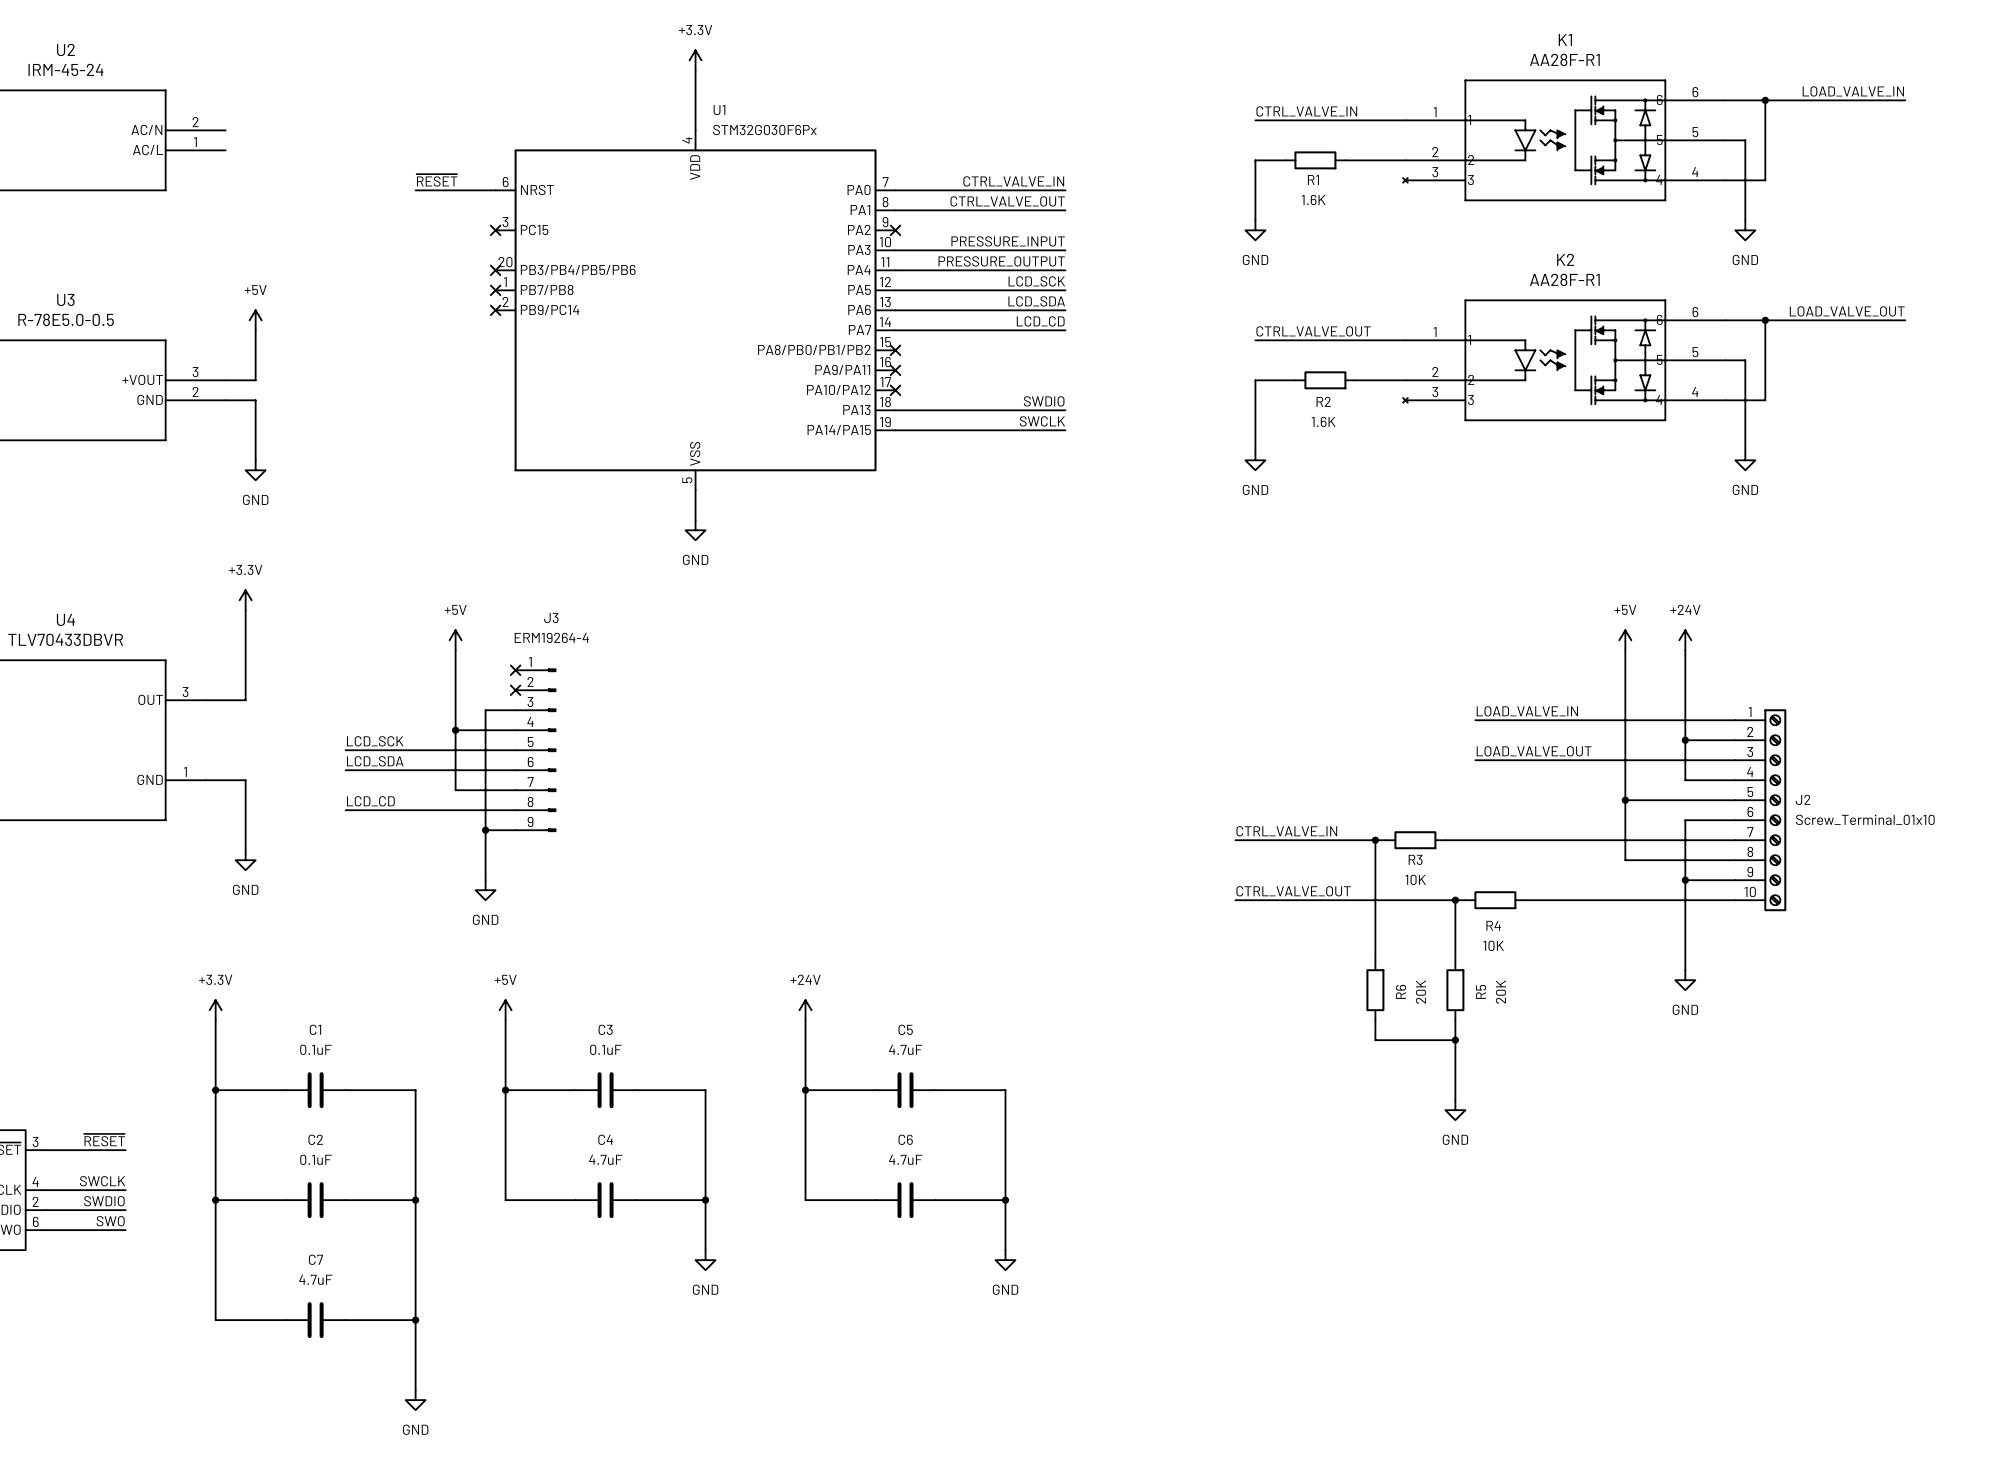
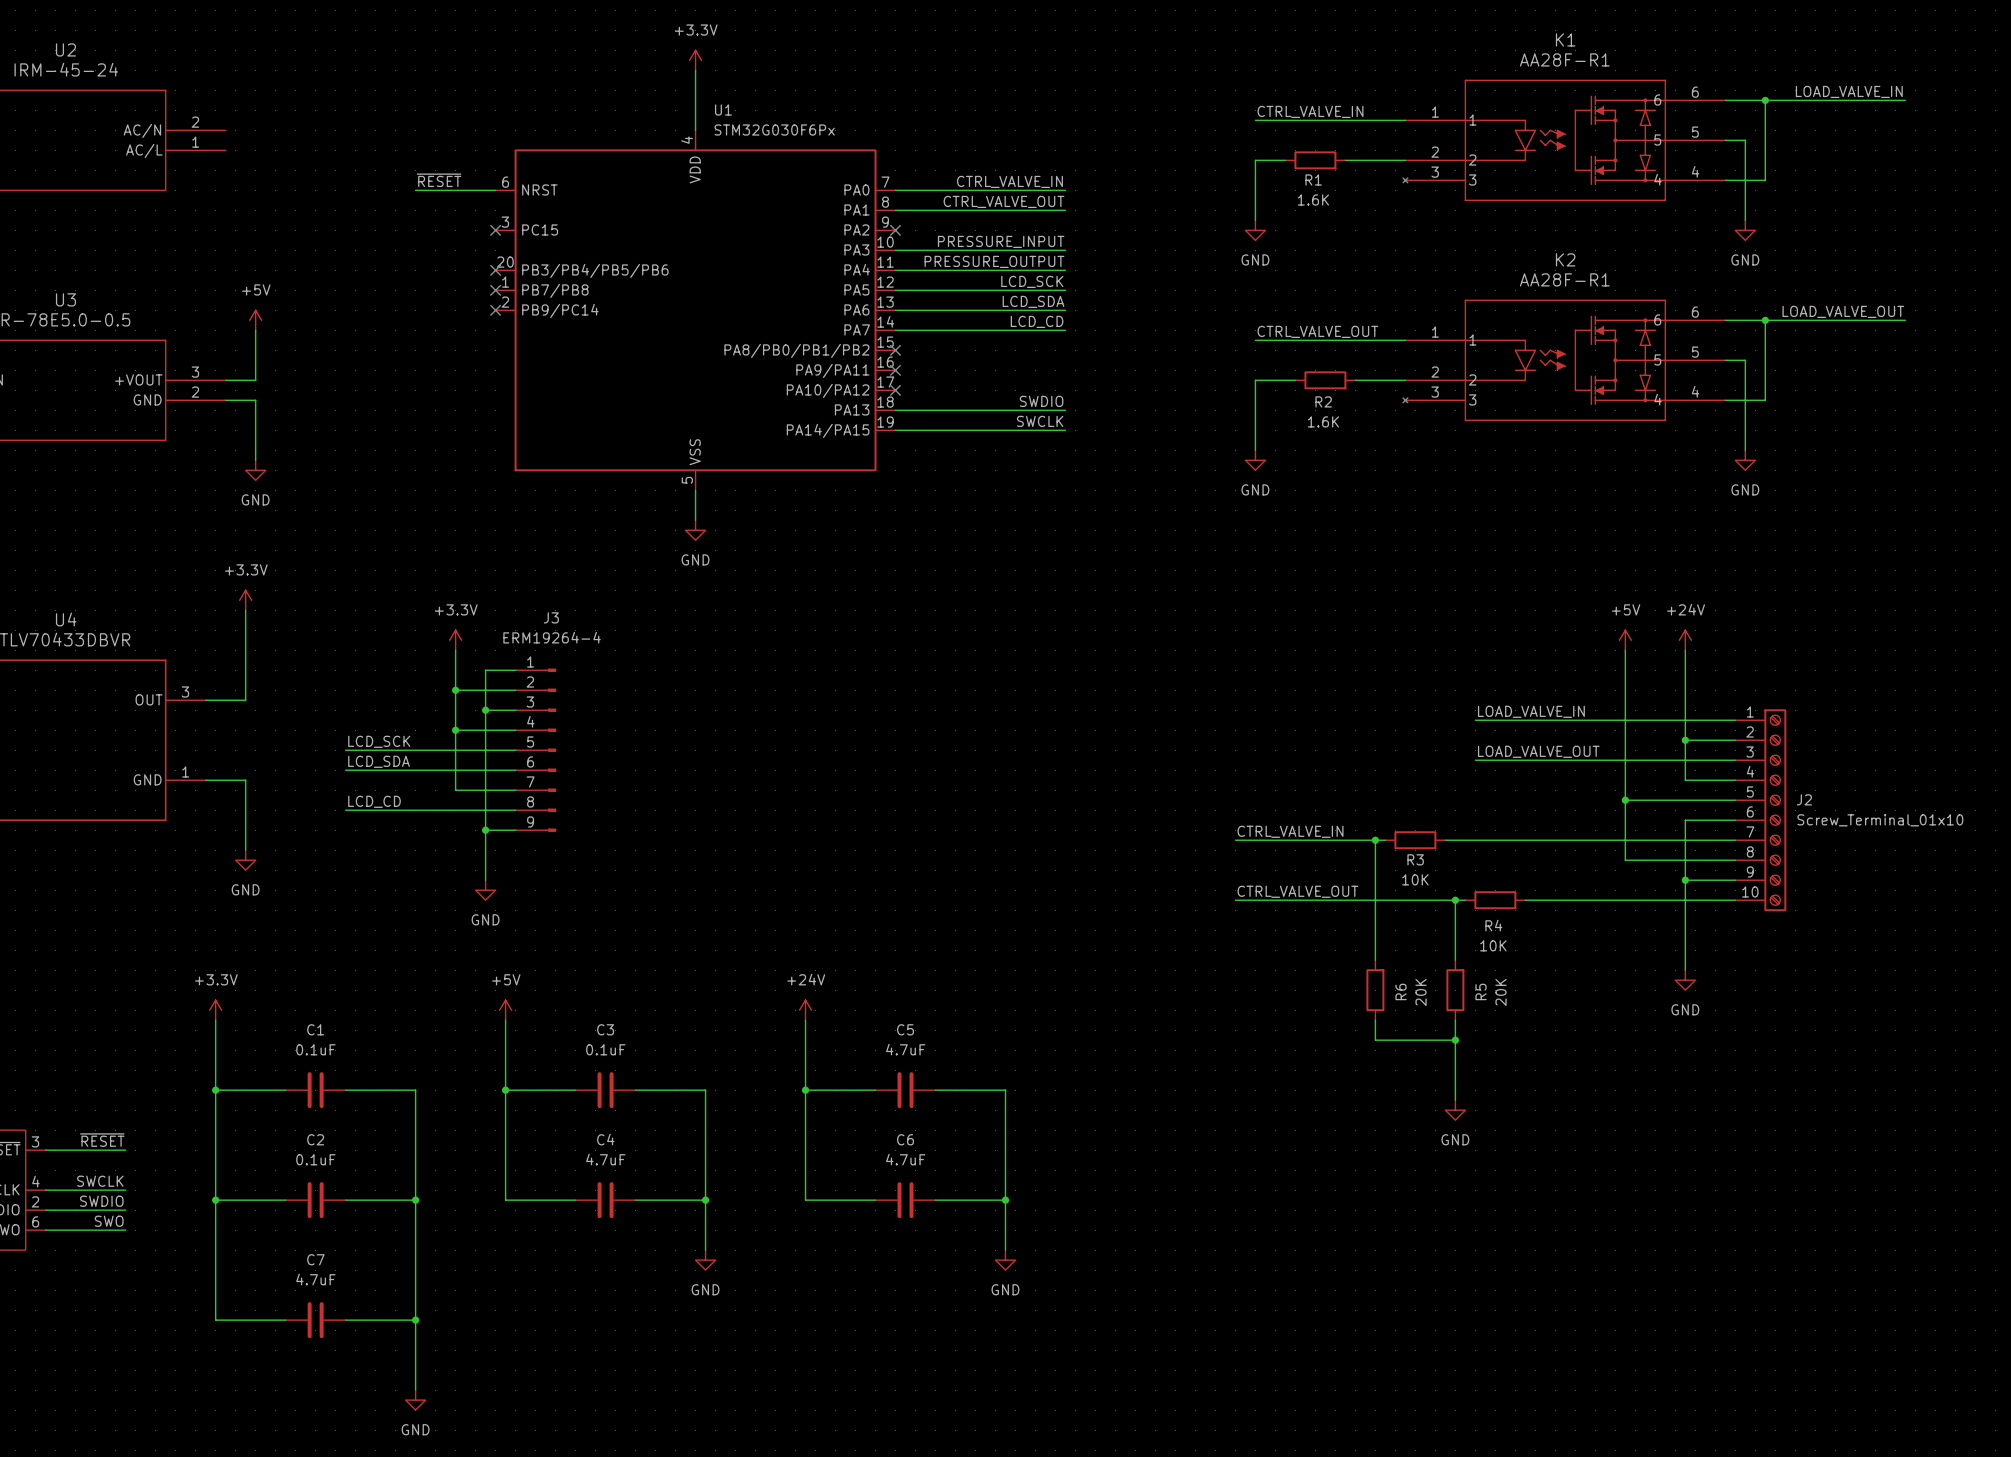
power symbol: +5V (455, 640) -> +3.3V (455, 640)
wire: none -> (515, 670) (485, 670) (485, 710)
no-connect mark: (515, 670) -> none
wire: none -> (455, 690) (515, 690)
junction: none -> (455, 690)
no-connect mark: (515, 690) -> none
junction: none -> (485, 710)

